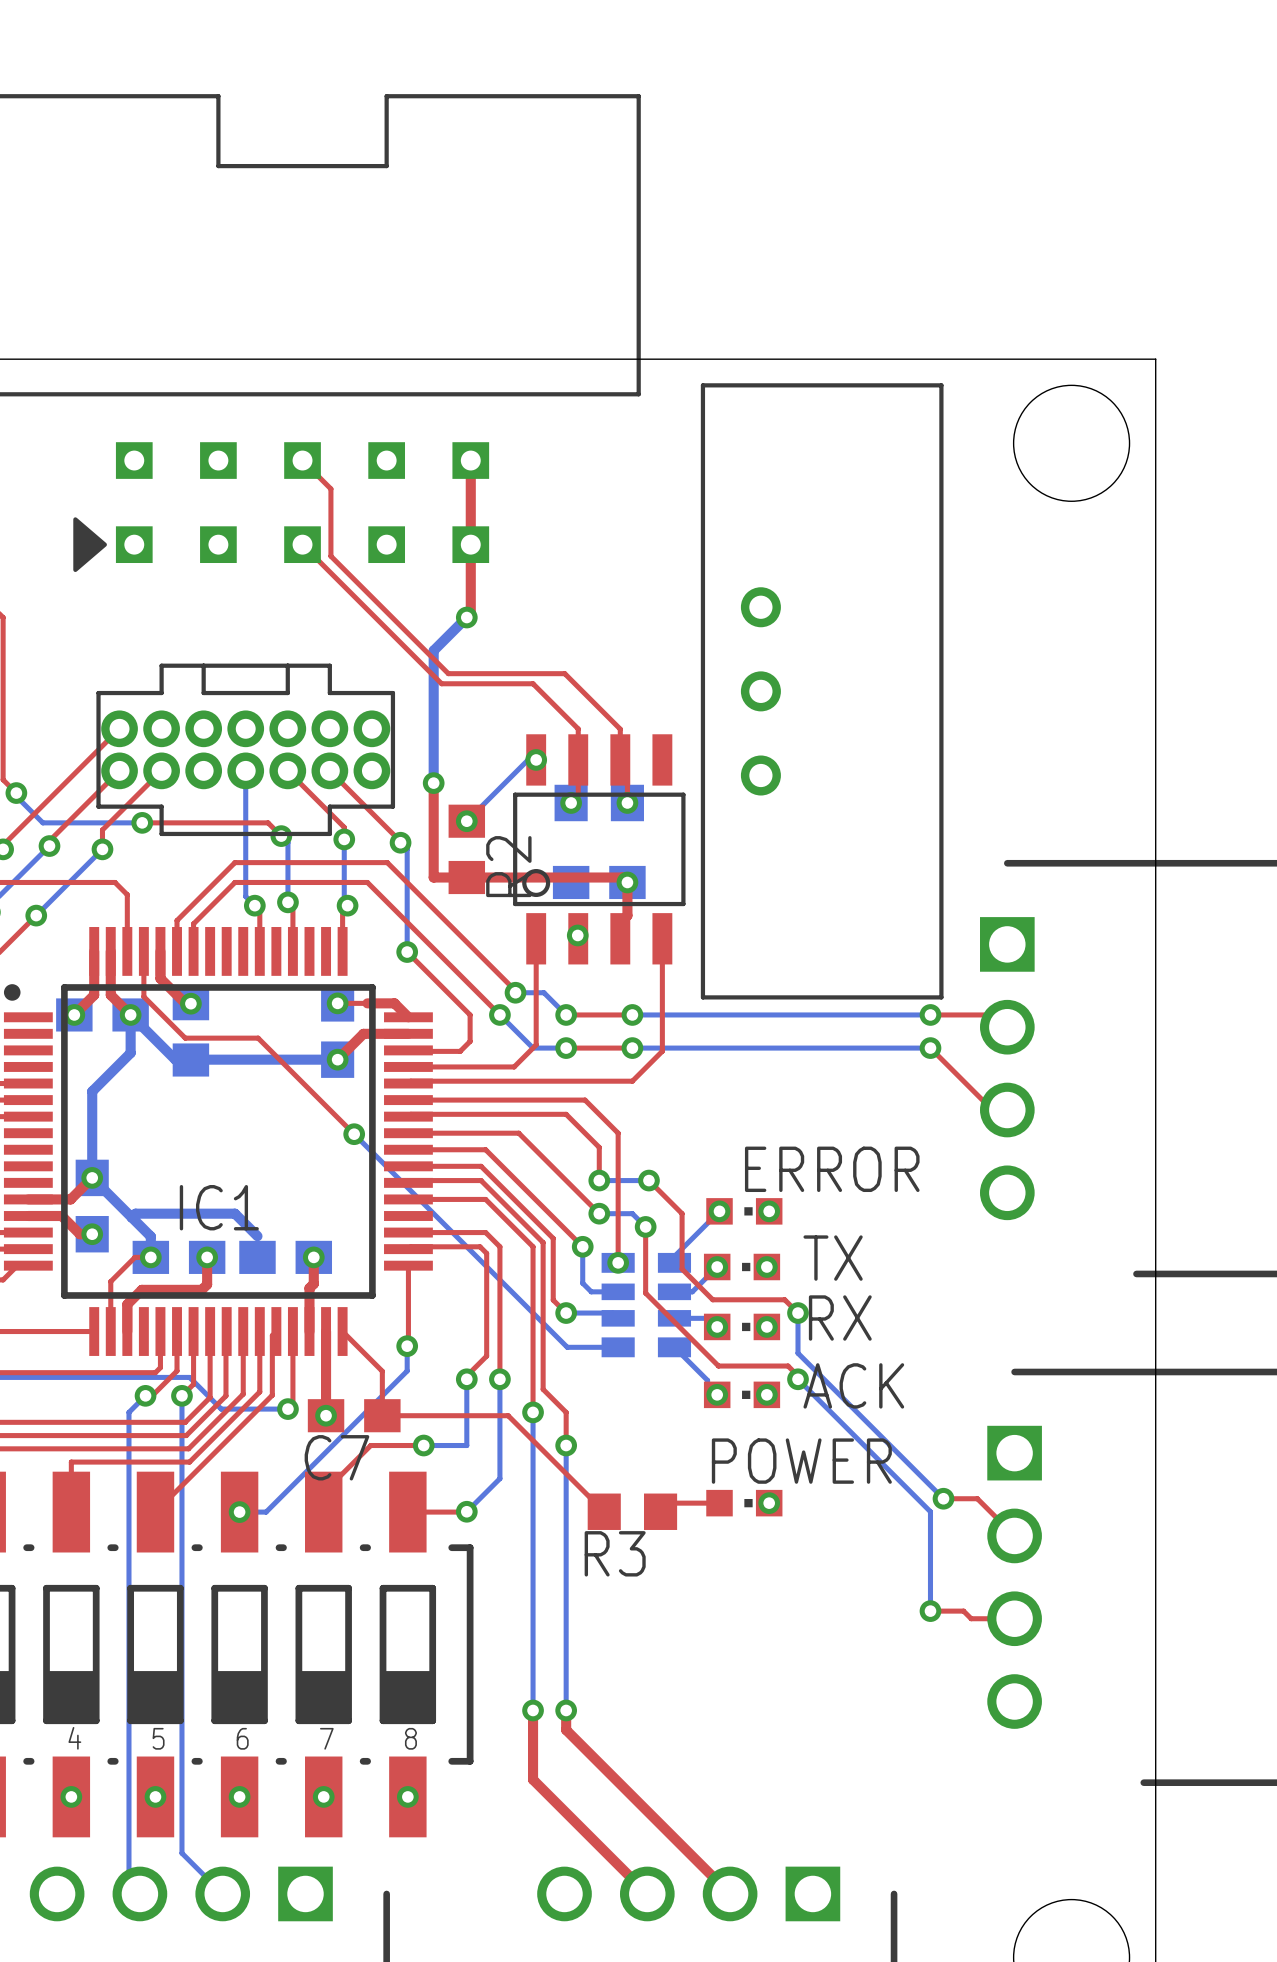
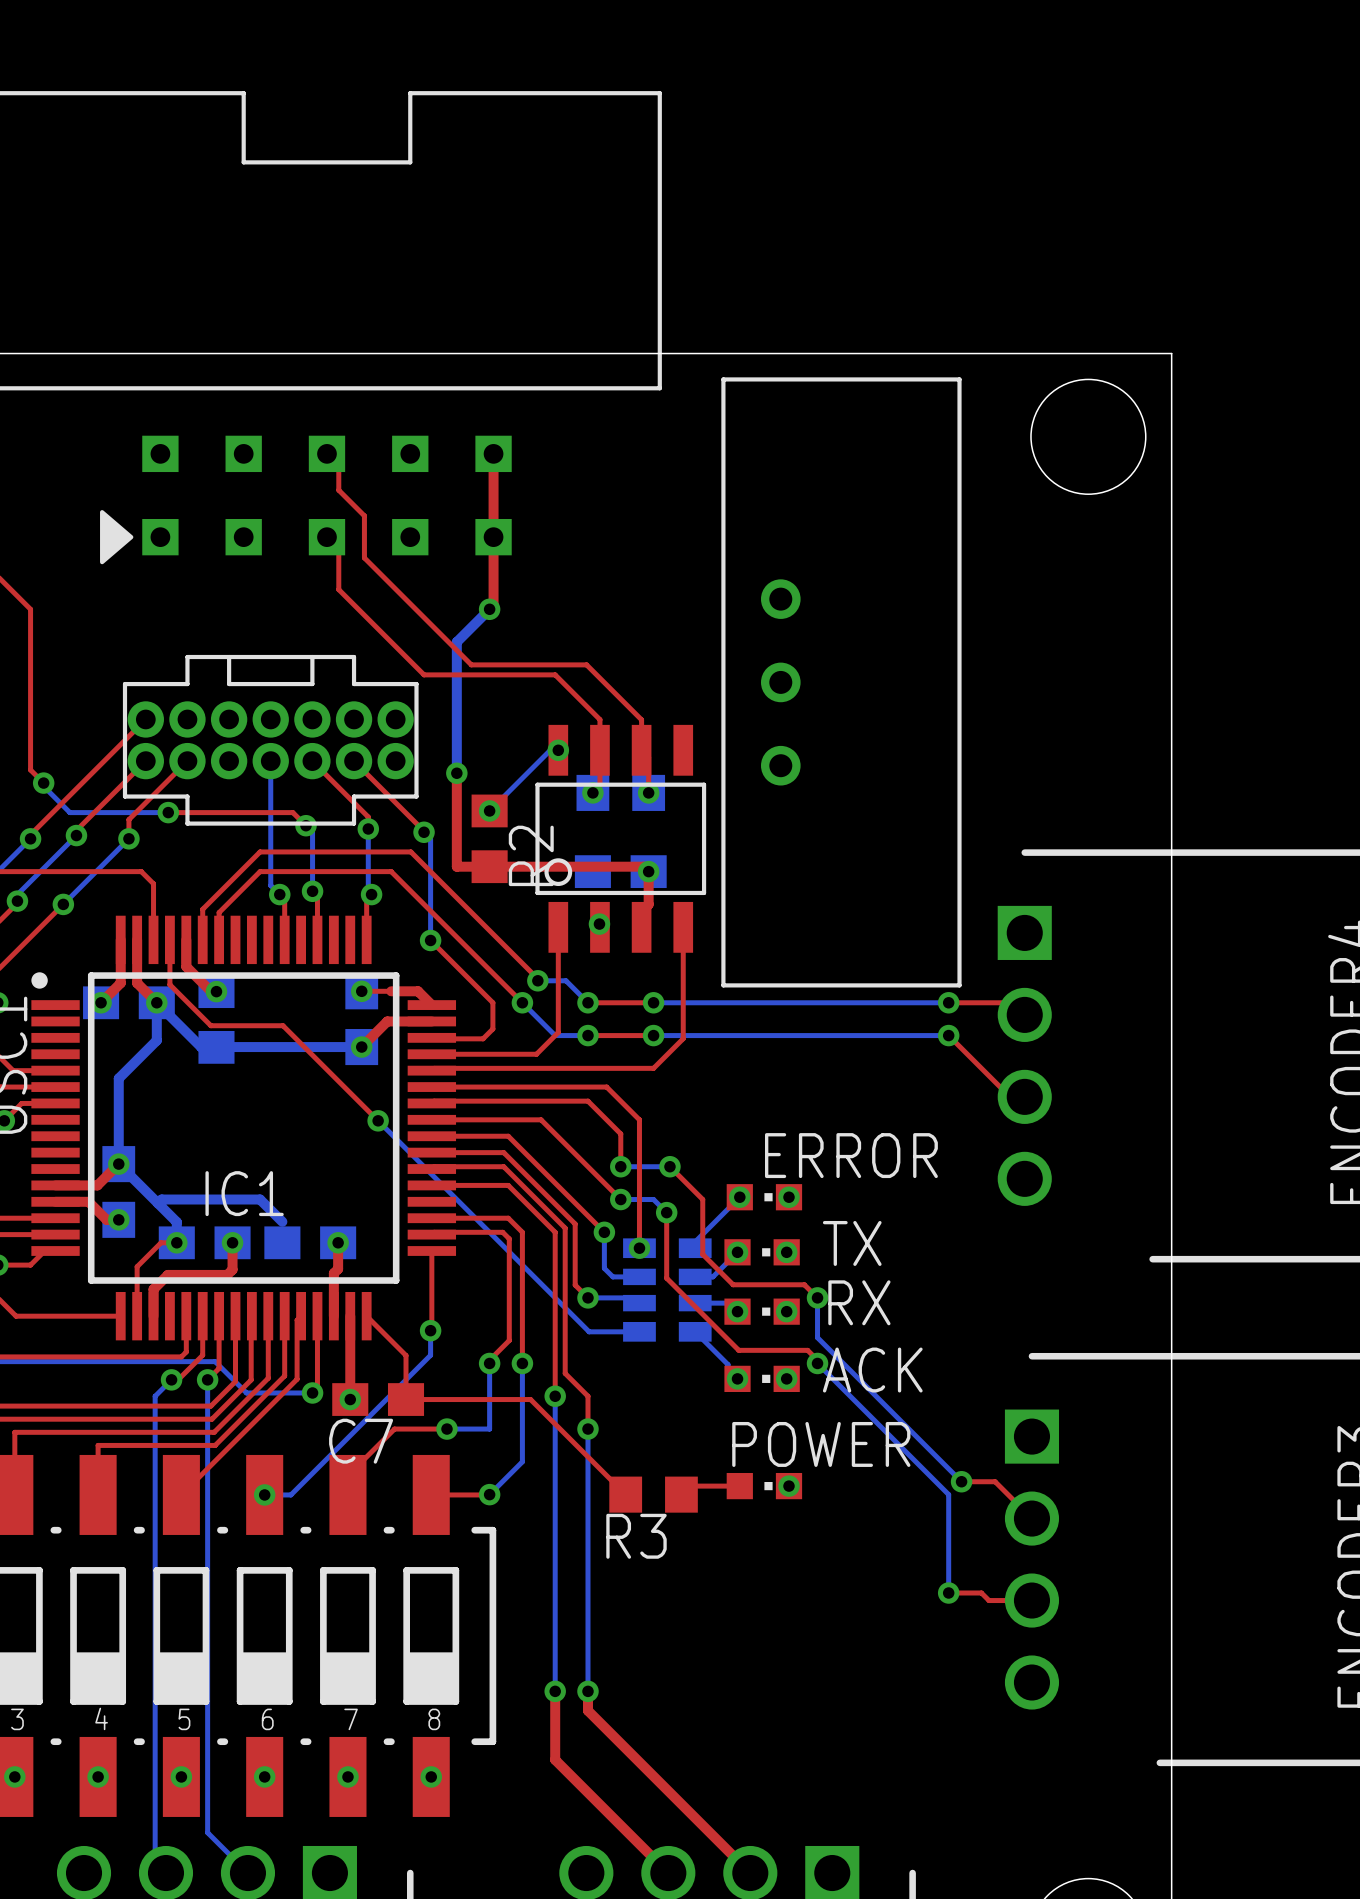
top track: (302, 460) (330, 488) (330, 556) (340, 565) -> (338, 453) (338, 490) (364, 515) (364, 557)
top track: (302, 544) (441, 683) -> (338, 537) (338, 589) (424, 674) (464, 674)

